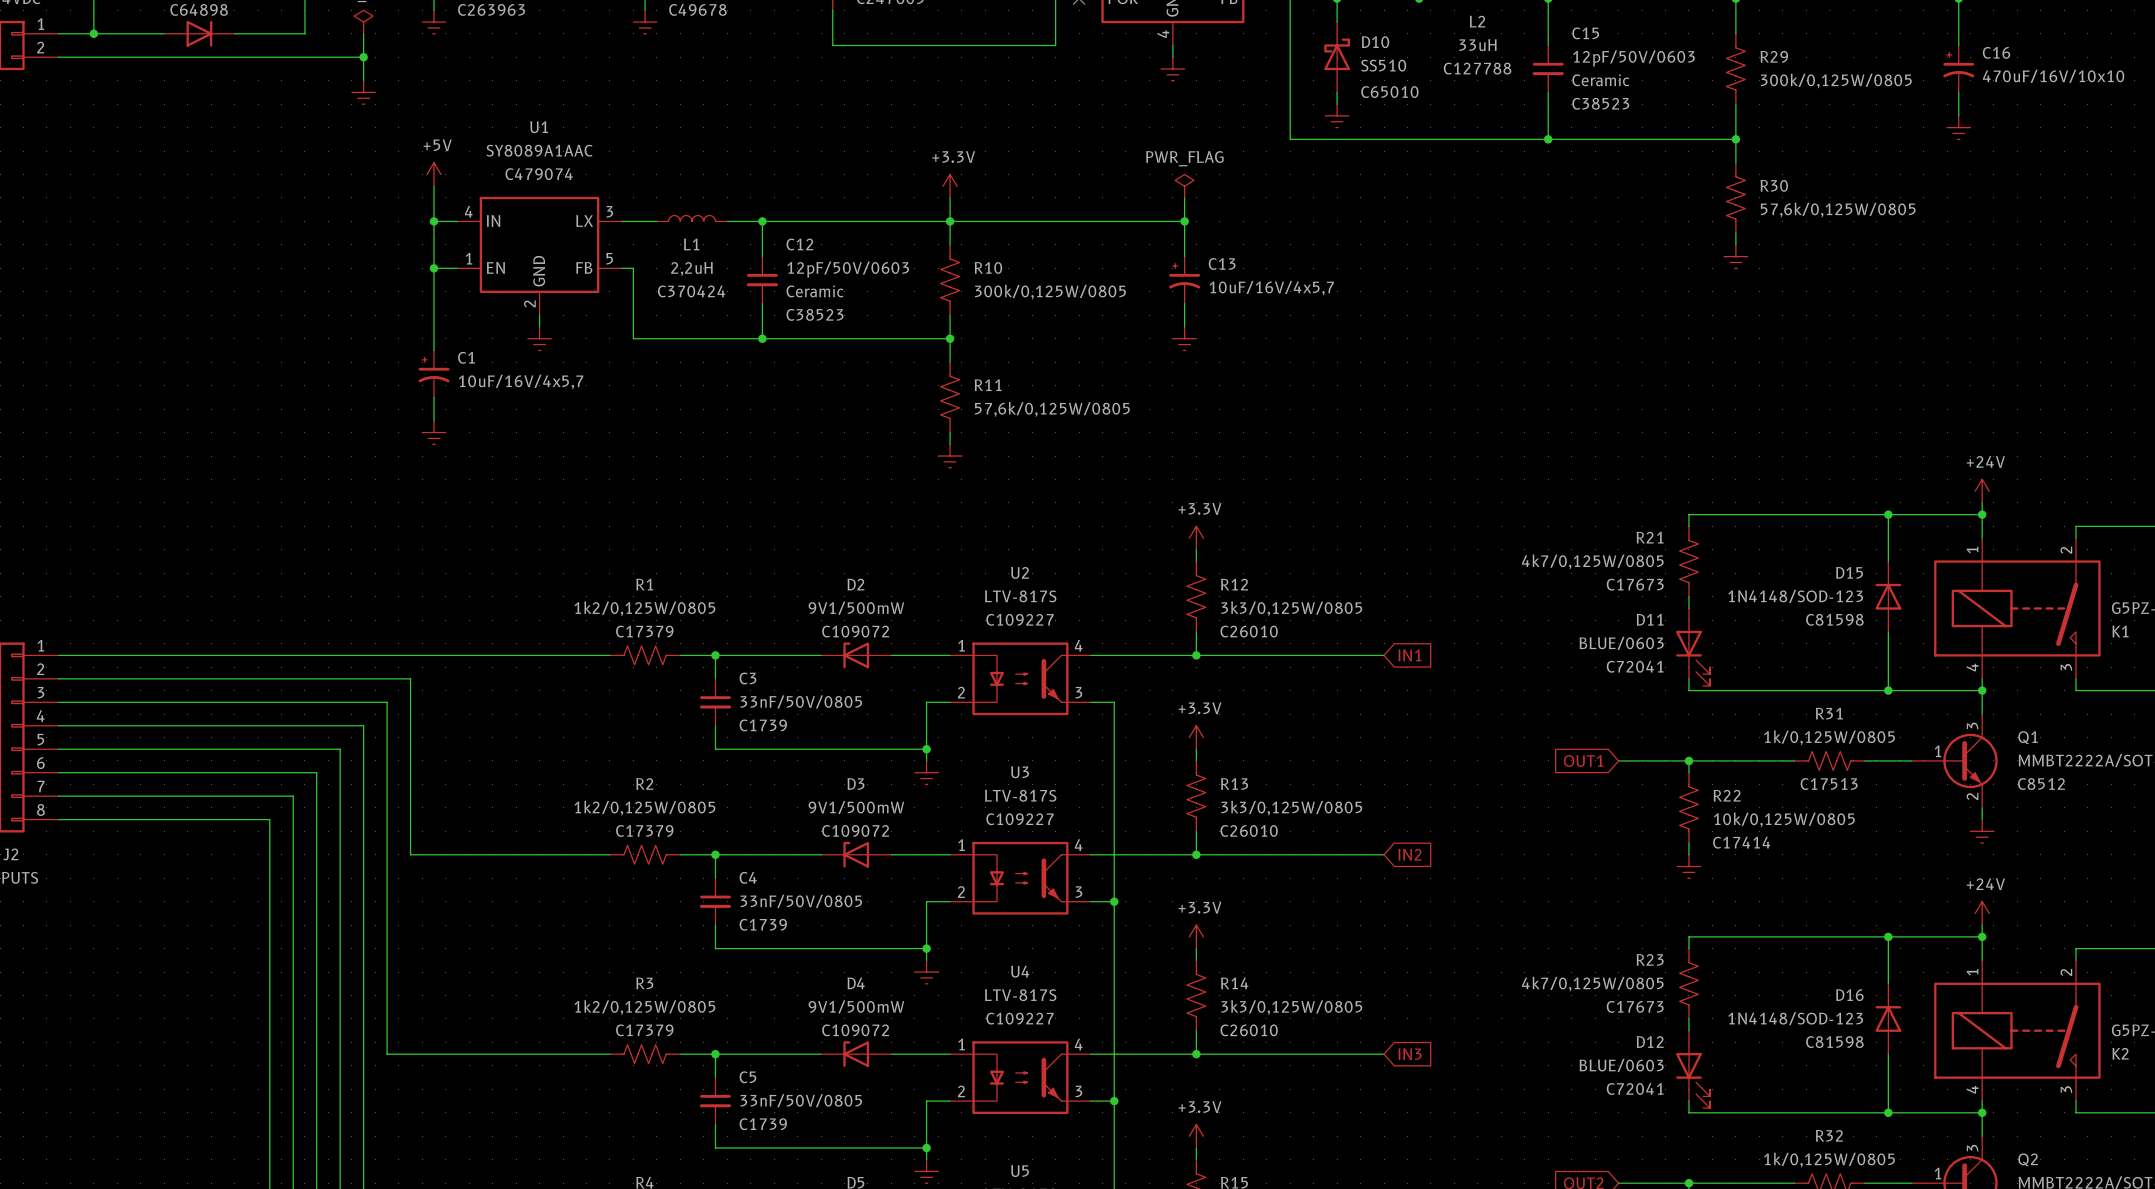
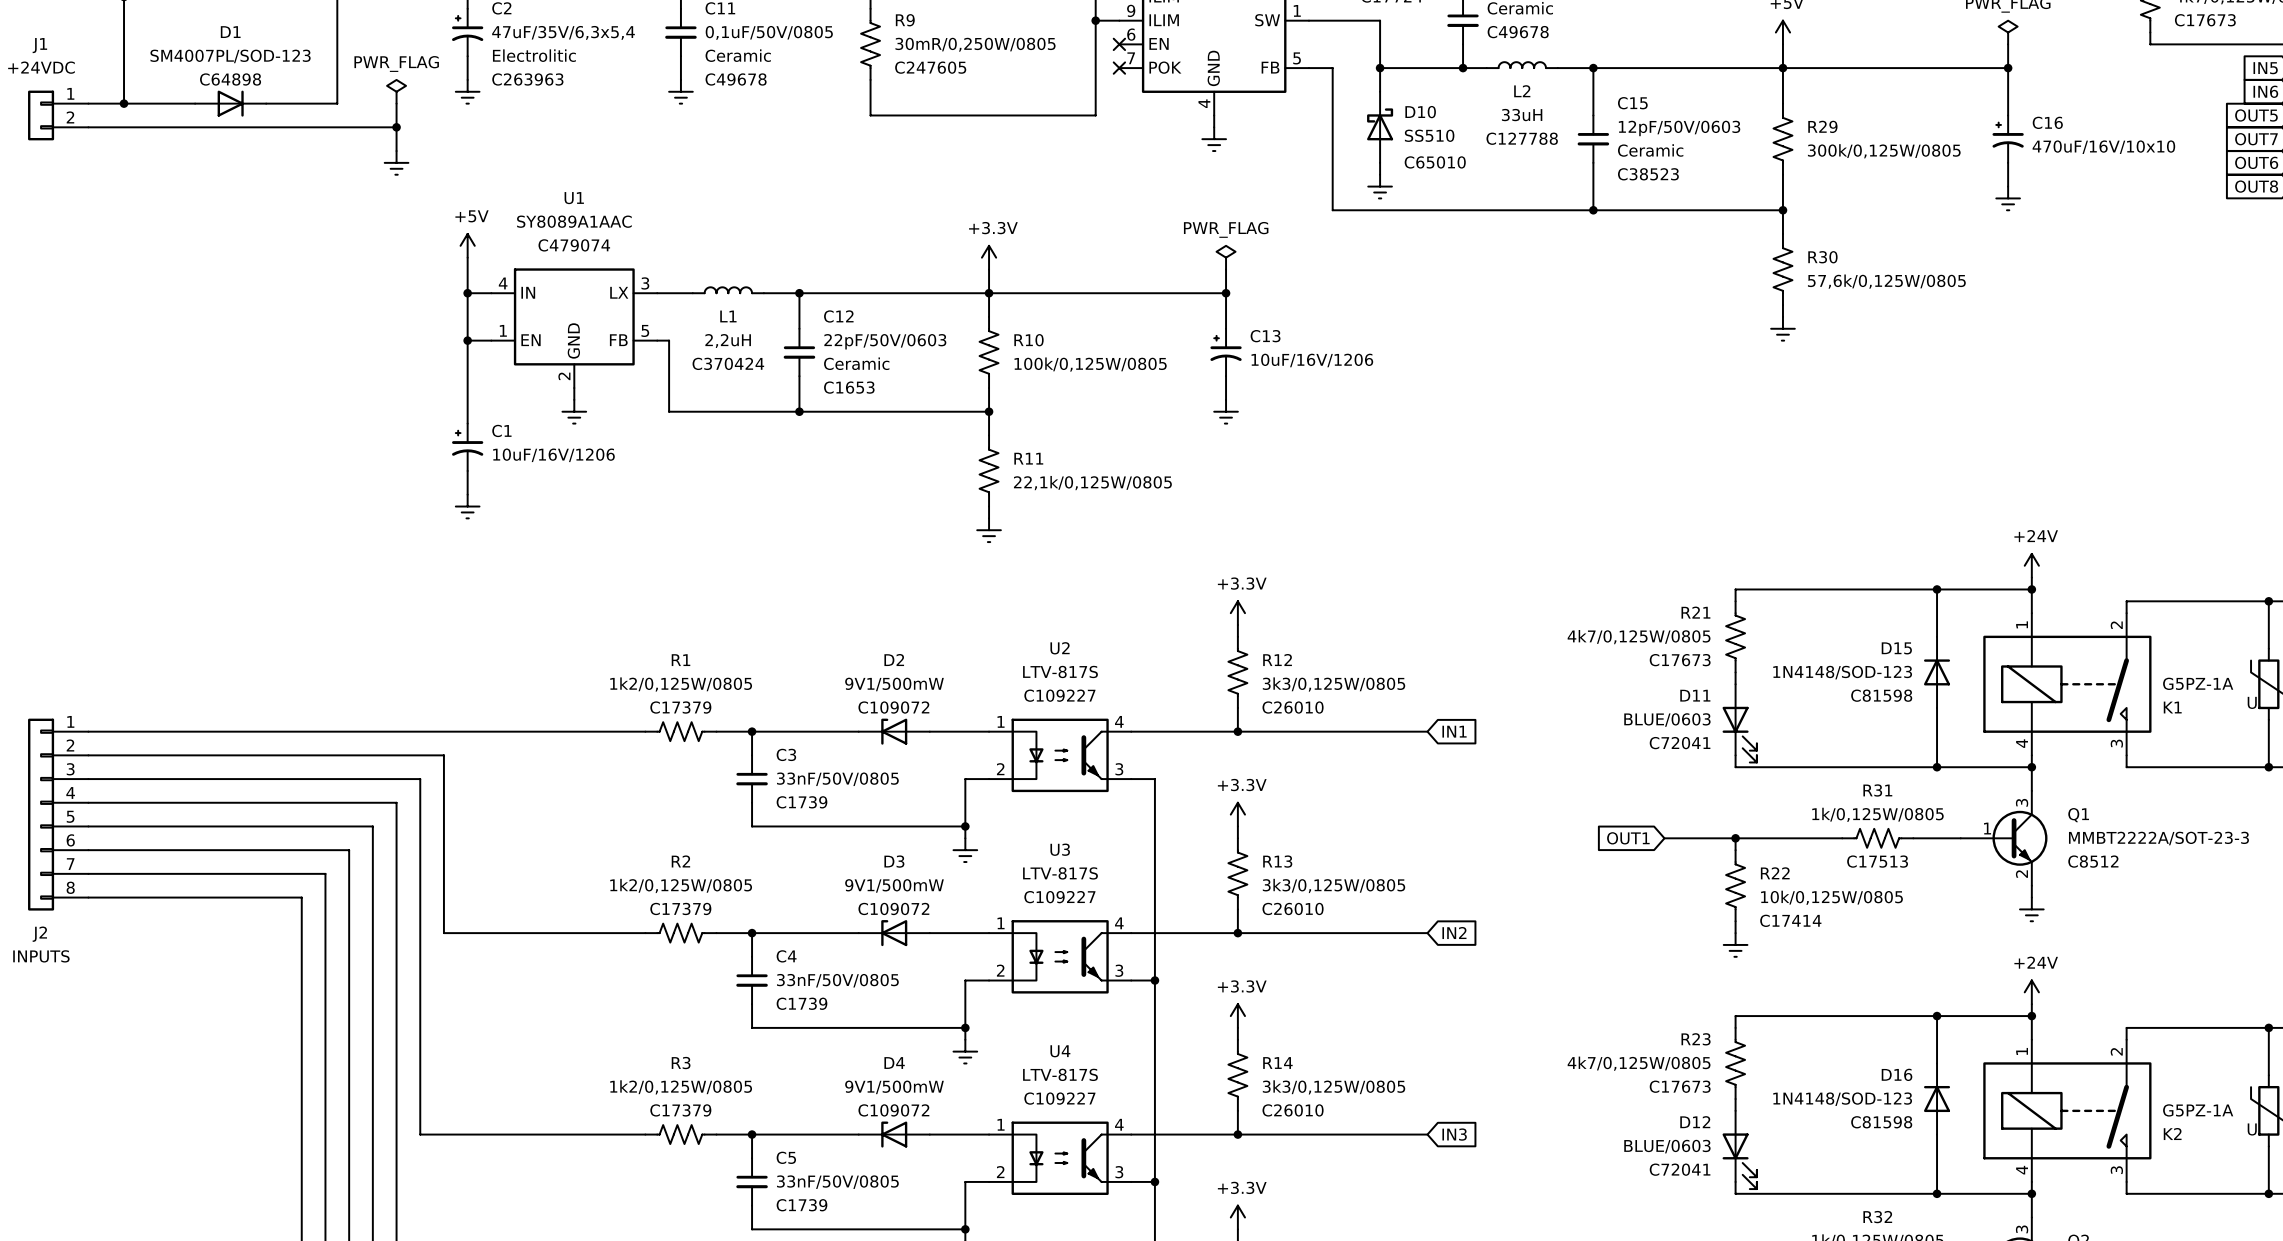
C12 value: 12pF/50V/0603 (848, 269) -> 22pF/50V/0603 (885, 341)
C13 value: 10uF/16V/4x5,7 (1271, 288) -> 10uF/16V/1206 (1312, 360)
R10 value: 300k/0,125W/0805 (1050, 292) -> 100k/0,125W/0805 (1090, 364)
C12 text: C38523 (814, 314) -> C1653 (849, 387)
C1 value: 10uF/16V/4x5,7 (521, 382) -> 10uF/16V/1206 (553, 455)
R11 value: 57,6k/0,125W/0805 (1052, 409) -> 22,1k/0,125W/0805 (1092, 483)

